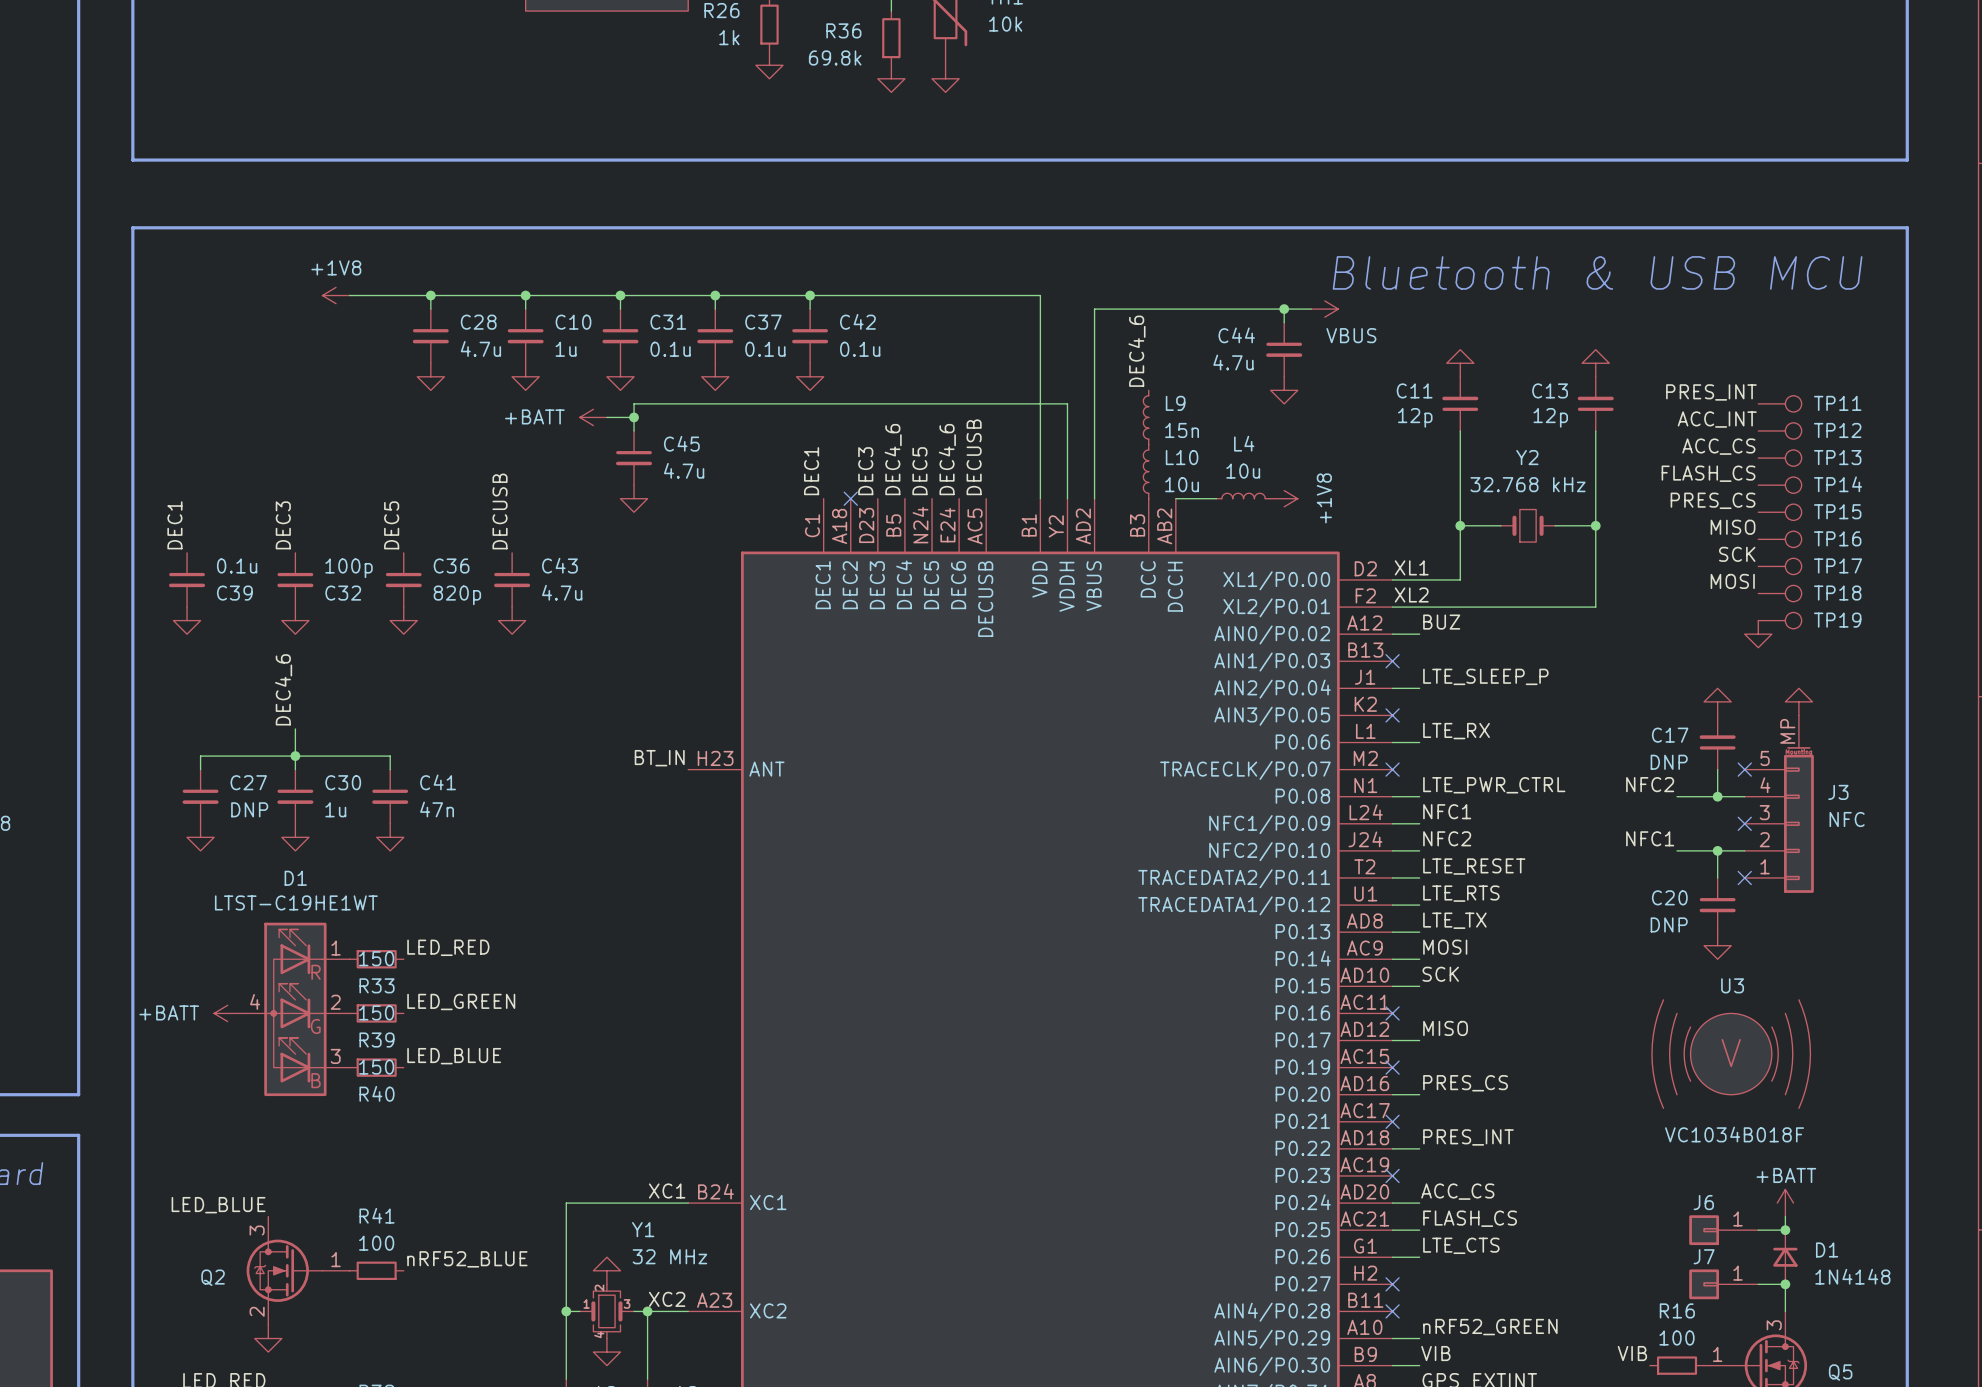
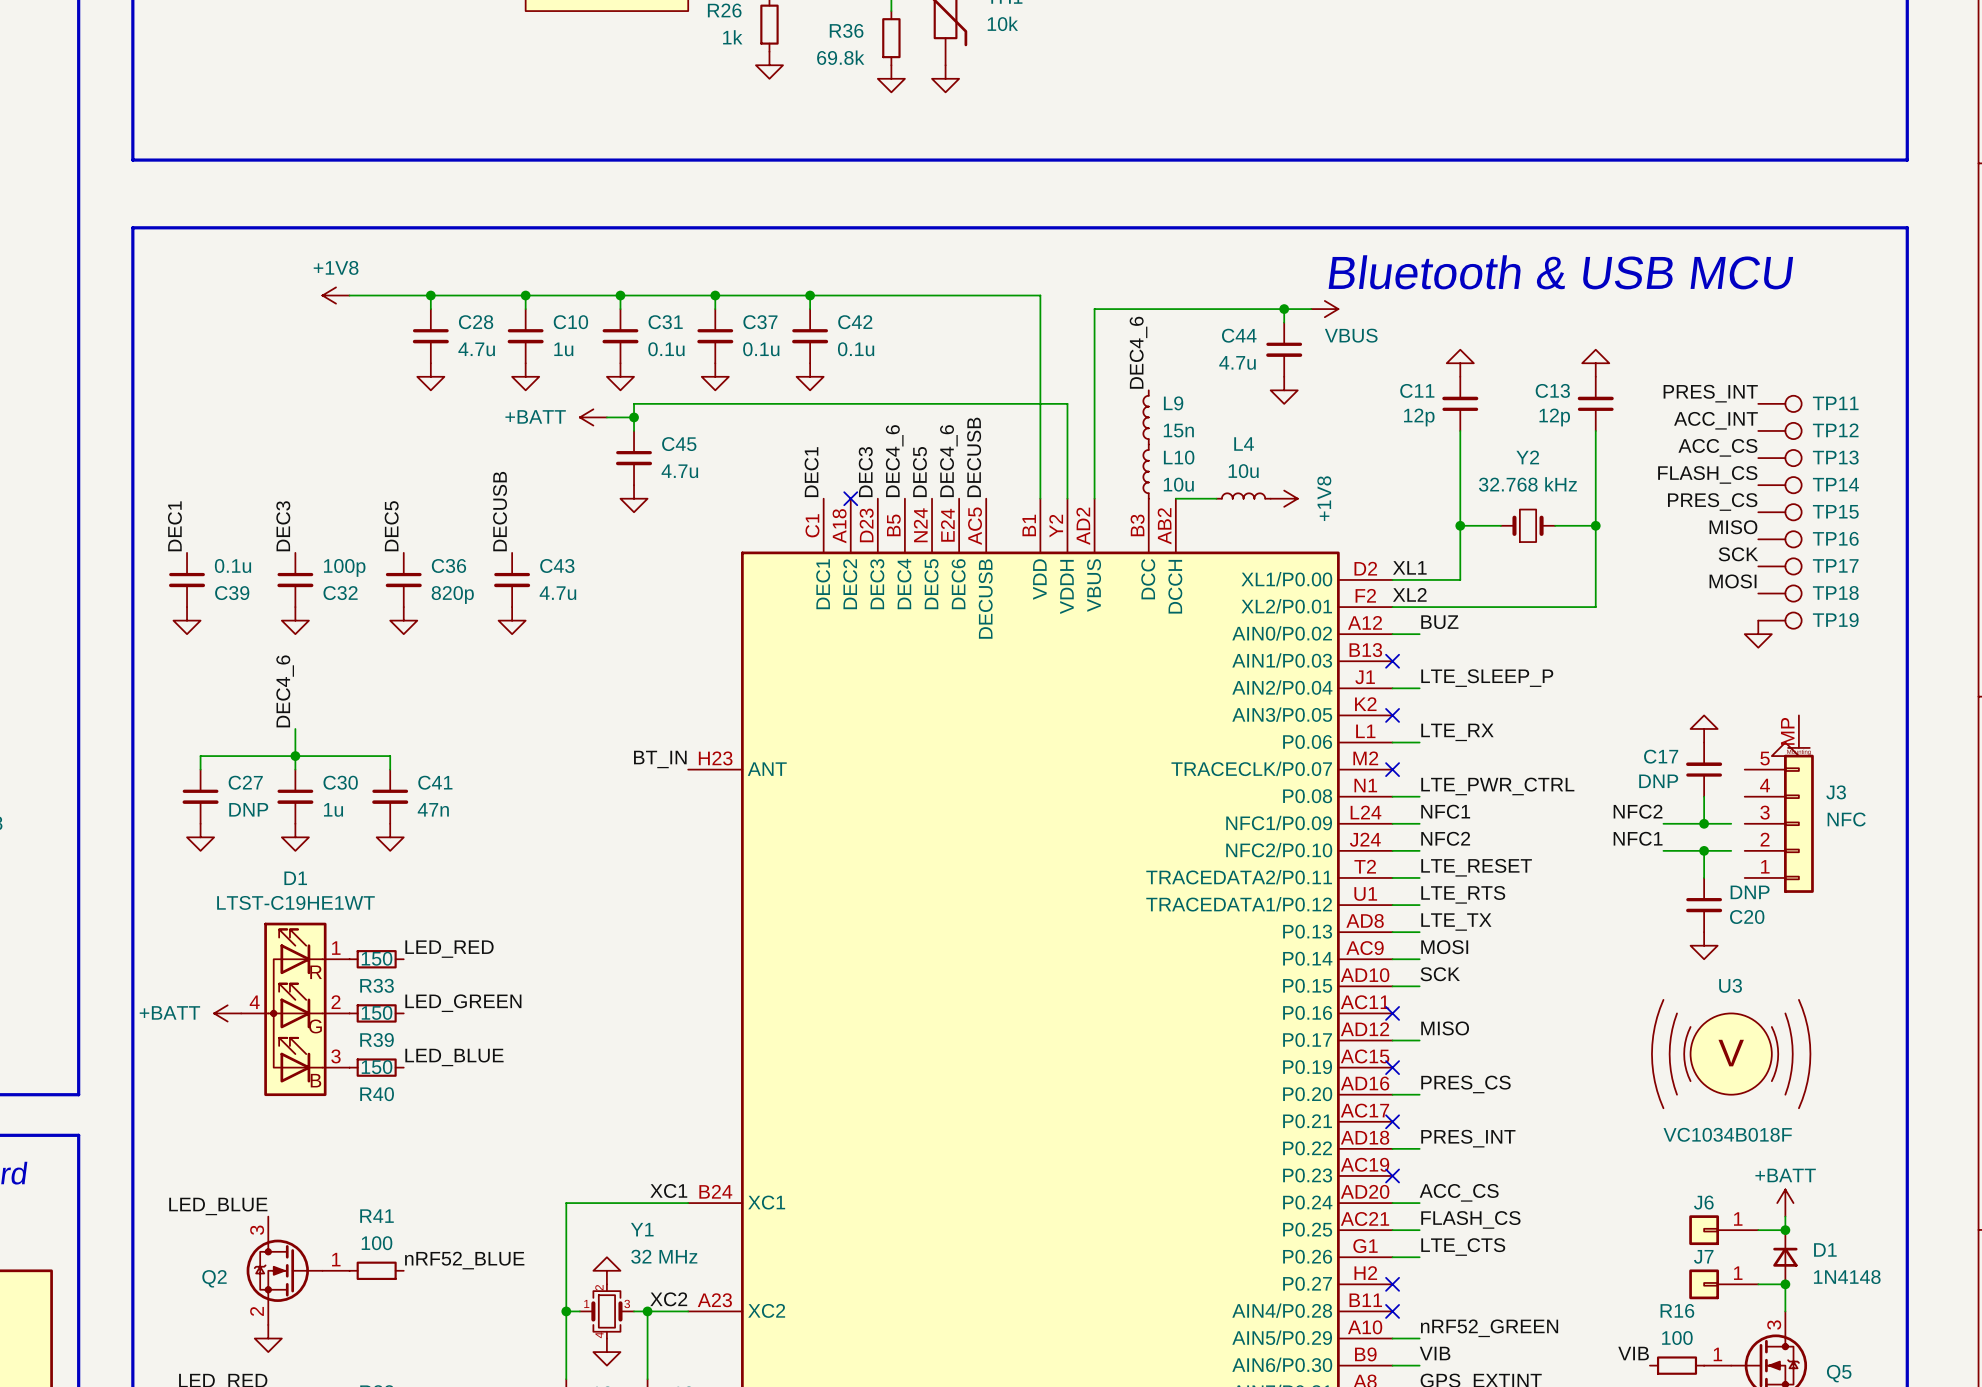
power symbol position: (1717, 701) -> (1704, 728)
power symbol: (1798, 701) -> none
C17 name position: C17 (1670, 735) -> C17 (1661, 756)
C17 position: (1717, 742) -> (1704, 769)
power symbol: none -> (1785, 756)
C17 value position: DNP (1669, 762) -> DNP (1658, 781)
wire: (1717, 769) (1717, 796) -> (1704, 796) (1704, 823)
no-connect mark: (1744, 769) -> none
label position: NFC2 (1650, 784) -> NFC2 (1638, 811)
wire: (1677, 796) (1744, 796) -> (1663, 823) (1731, 823)
junction: (1717, 796) -> none
junction: none -> (1704, 823)
no-connect mark: (1744, 823) -> none
label position: NFC1 (1650, 838) -> NFC1 (1638, 838)
wire: (1717, 850) (1717, 877) -> (1704, 850) (1704, 877)
junction position: (1717, 850) -> (1704, 850)
wire: (1731, 850) (1744, 850) -> (1663, 850) (1677, 850)
no-connect mark: (1744, 877) -> none
C20 name position: C20 (1669, 897) -> C20 (1747, 917)
C20 position: (1717, 905) -> (1704, 905)
C20 value position: DNP (1669, 924) -> DNP (1750, 892)
power symbol position: (1717, 945) -> (1704, 945)

